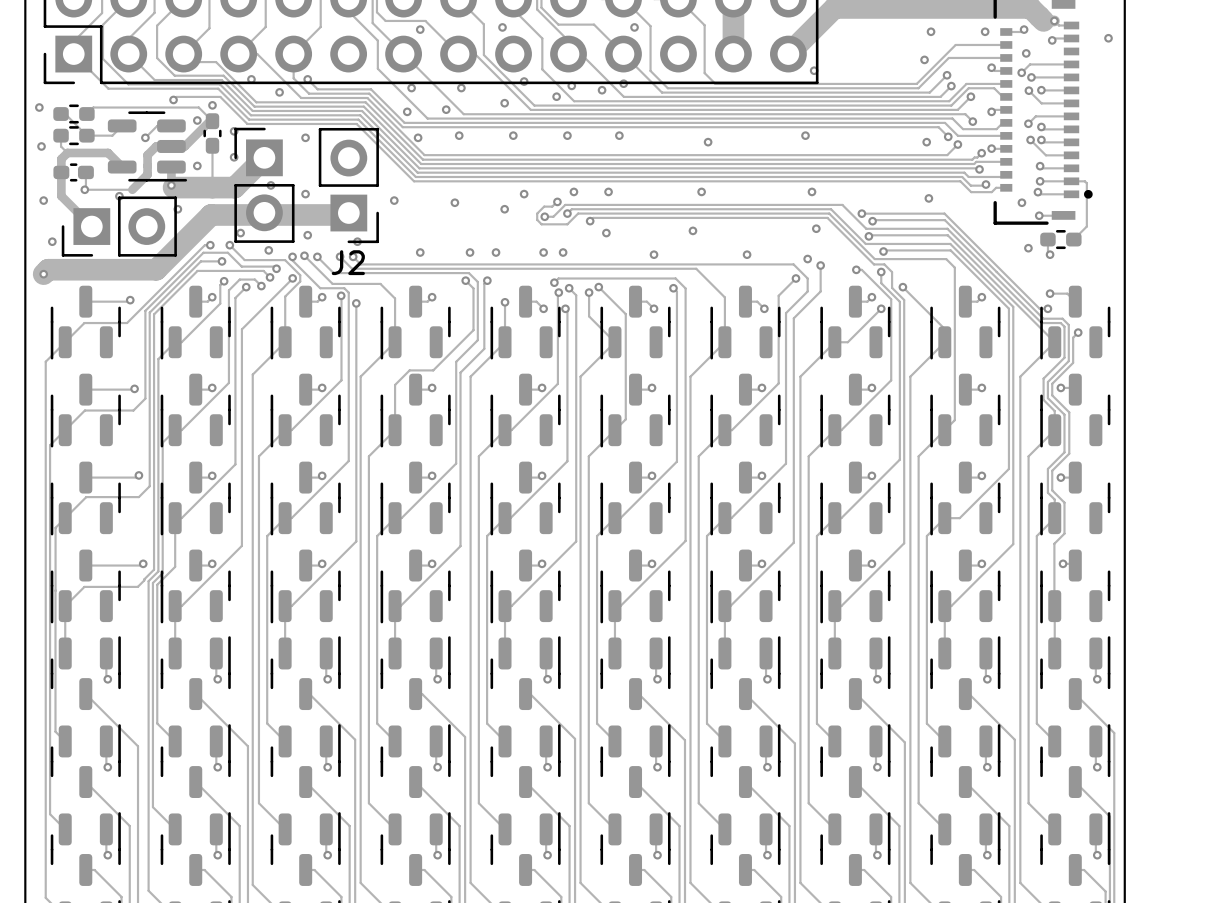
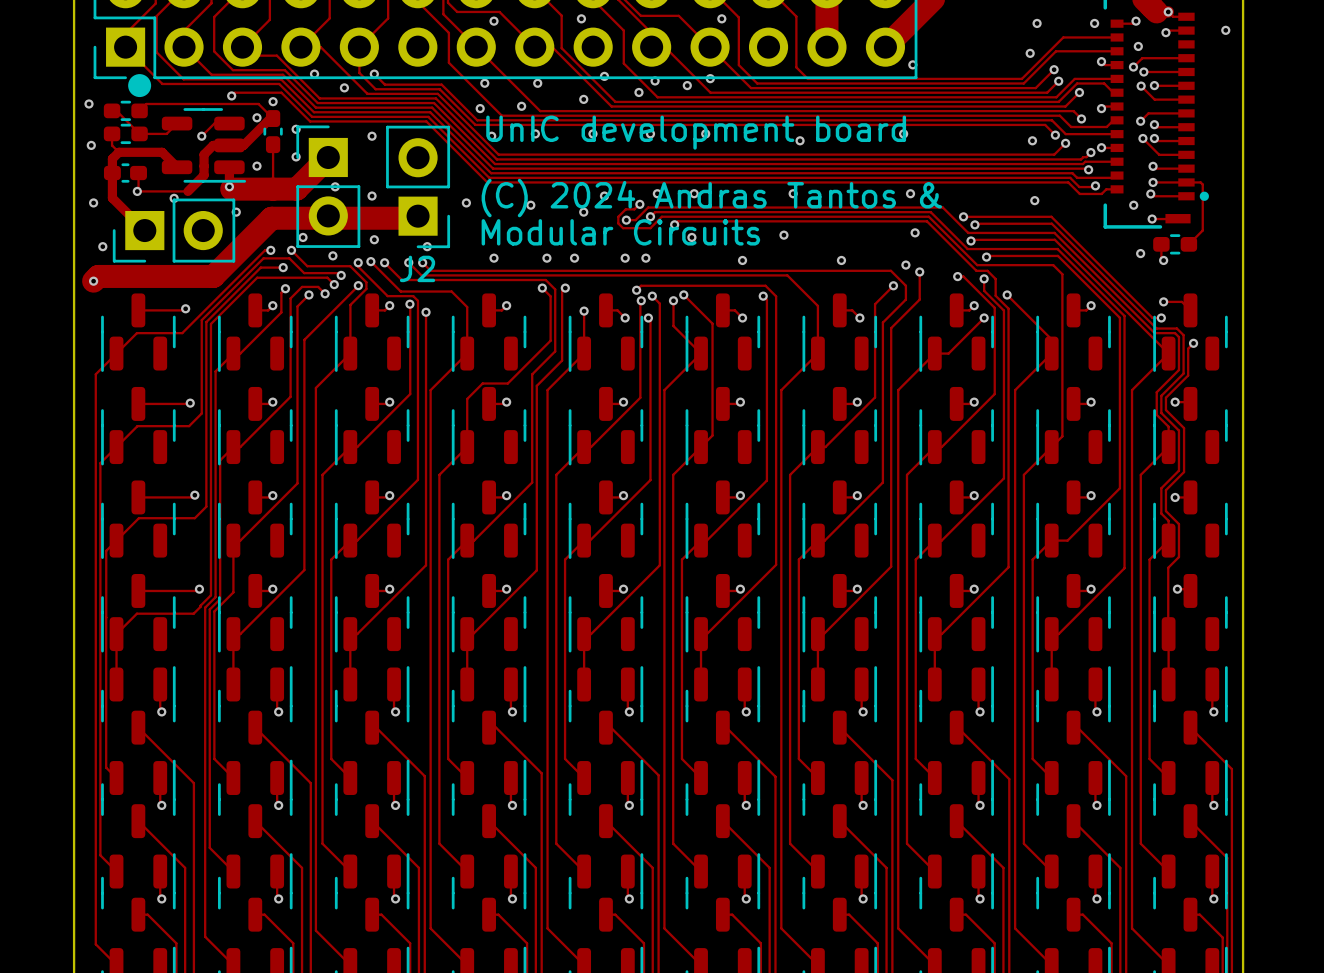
drawing: none -> [128, 74, 152, 98]
text: none -> UnIC development board (696, 132)
text: none -> (C) 2024 Andras Tantos & (711, 198)
text: none -> Modular Circuits (620, 232)

